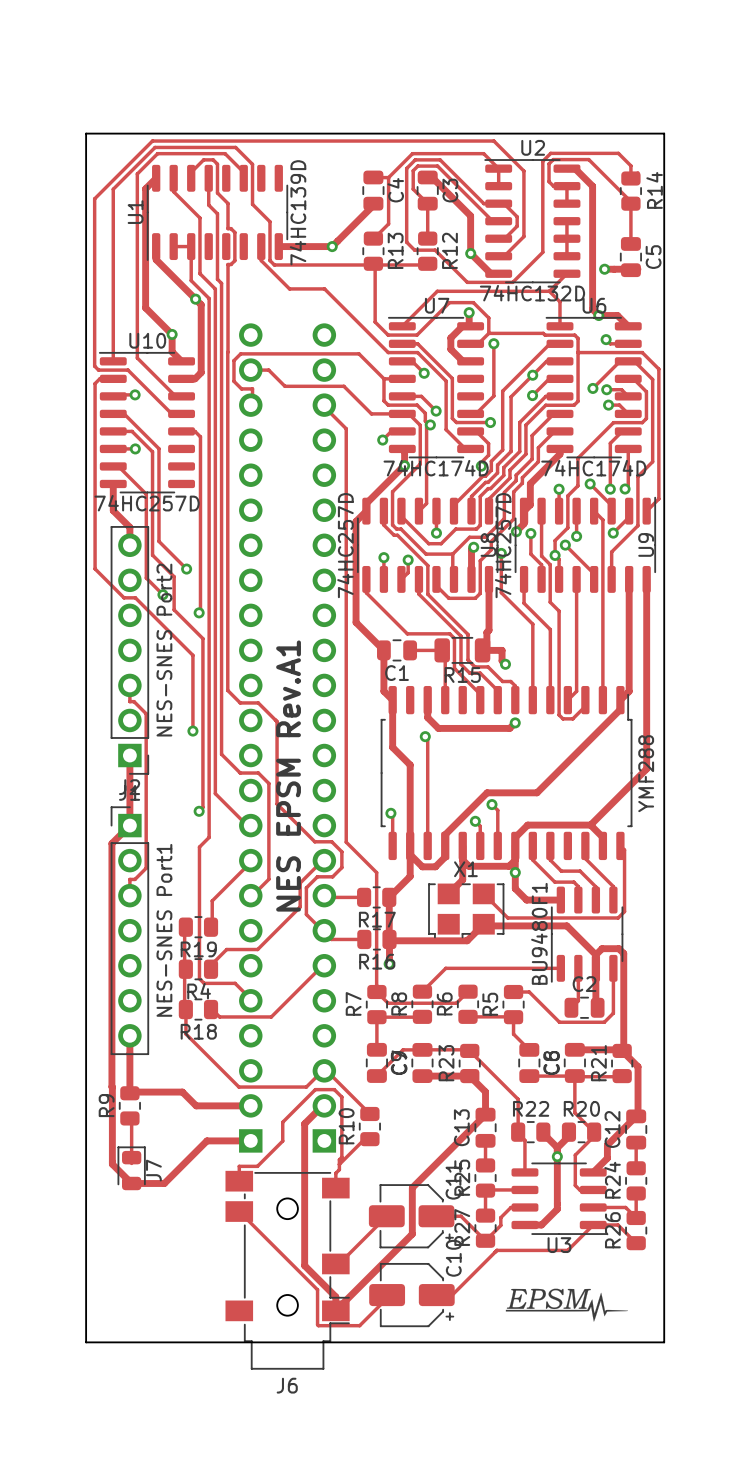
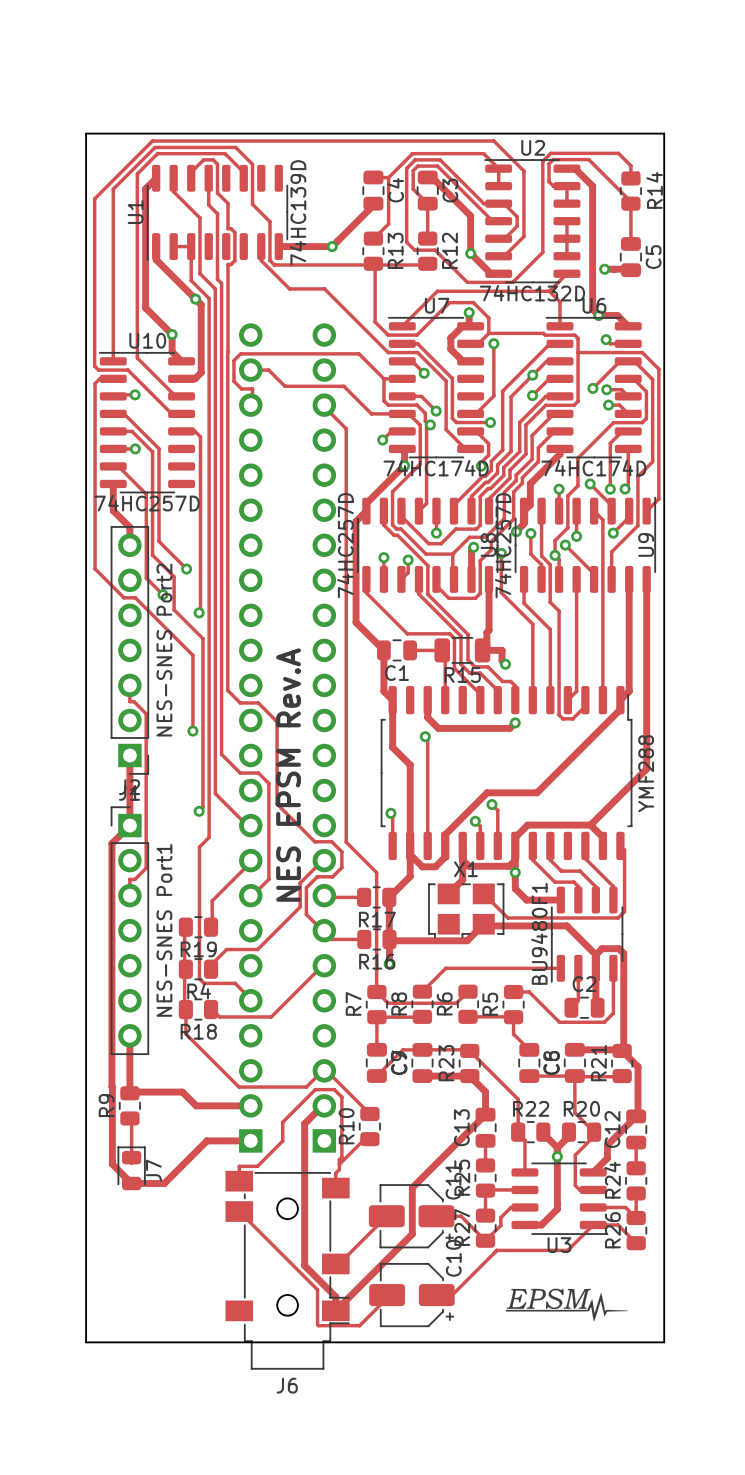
text: NES EPSM Rev.A1 (288, 776) -> NES EPSM Rev.A (288, 775)

